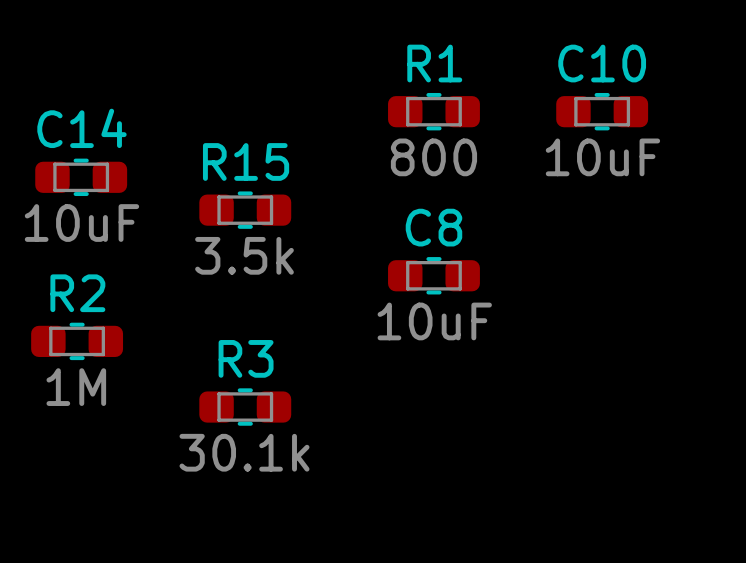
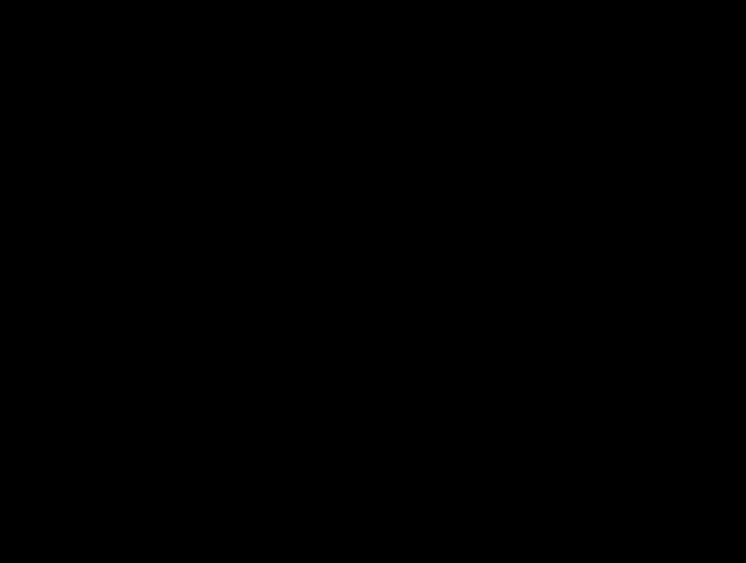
R1: 800 (433, 111) -> none
C10: 10uF (602, 111) -> none
C14: 10uF (81, 177) -> none
R15: 3.5k (245, 210) -> none
C8: 10uF (433, 275) -> none
R2: 1M (77, 341) -> none
R3: 30.1k (245, 407) -> none

